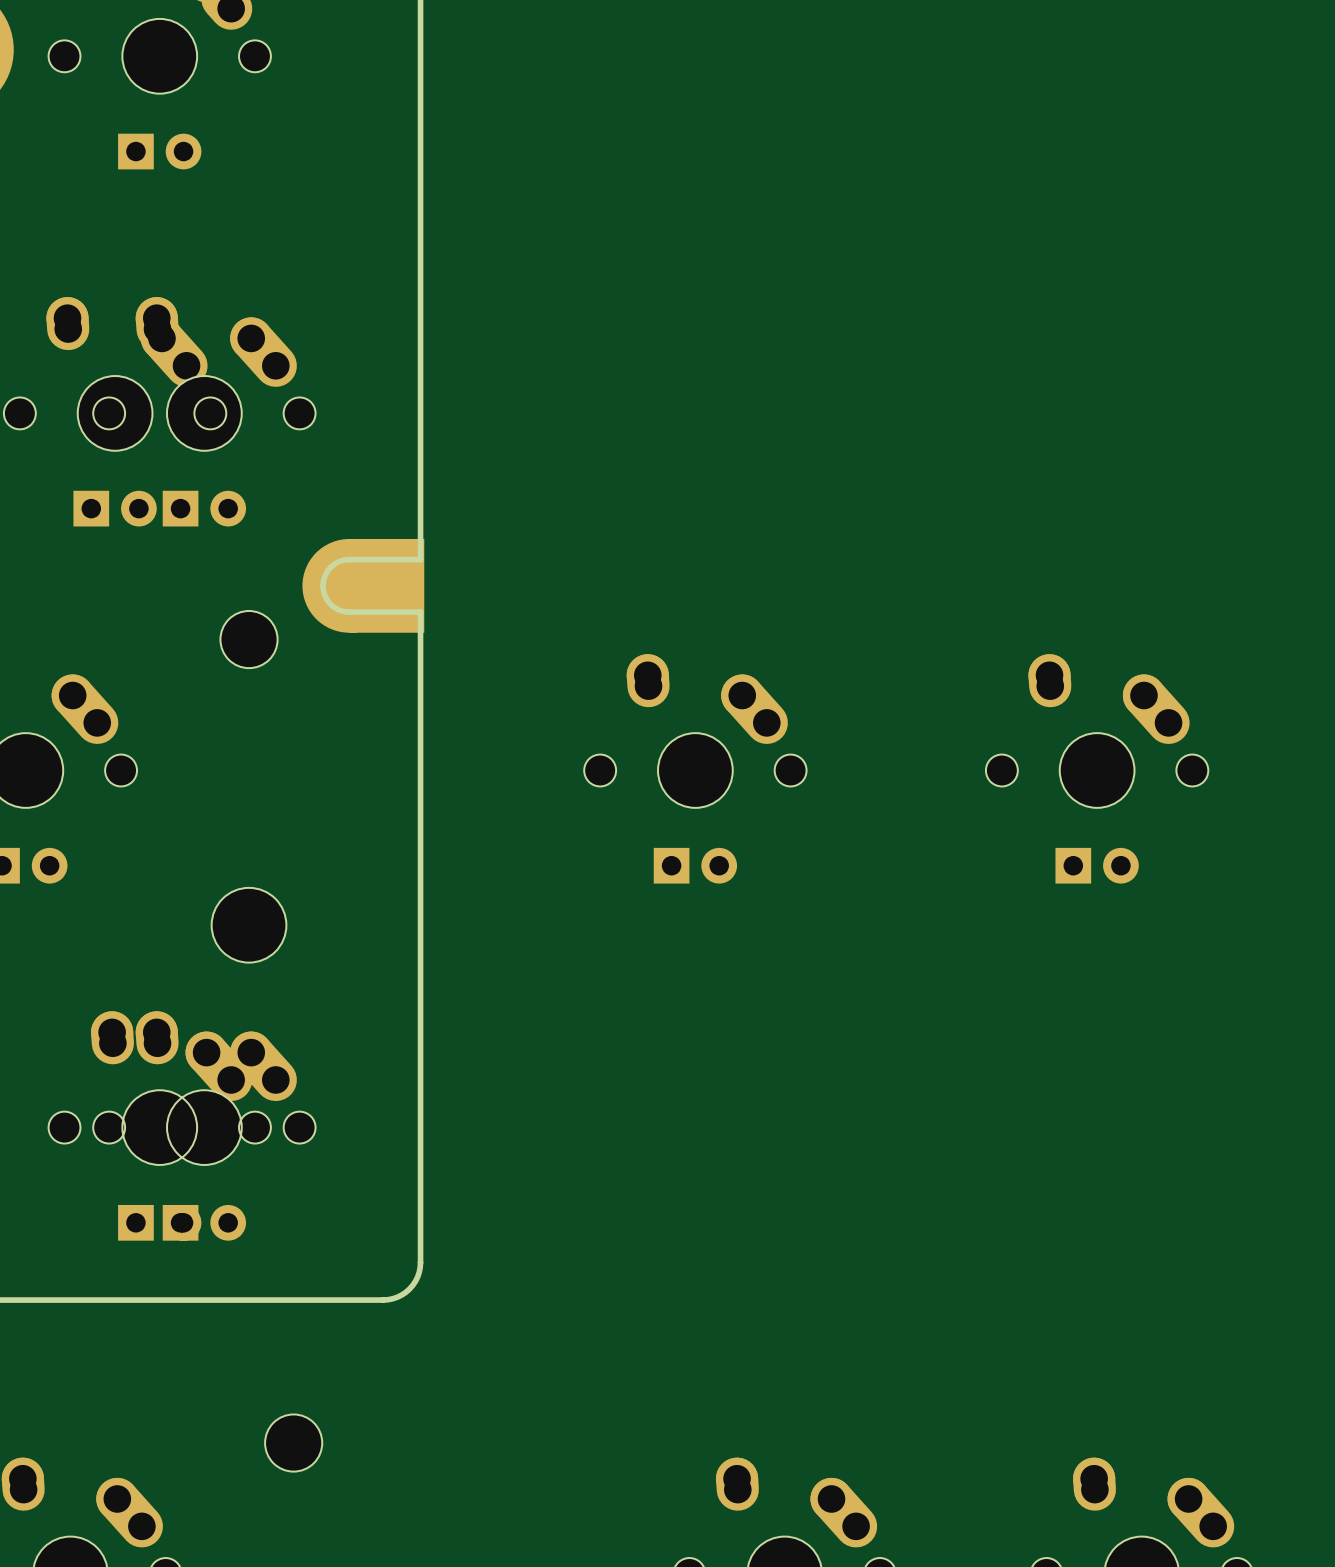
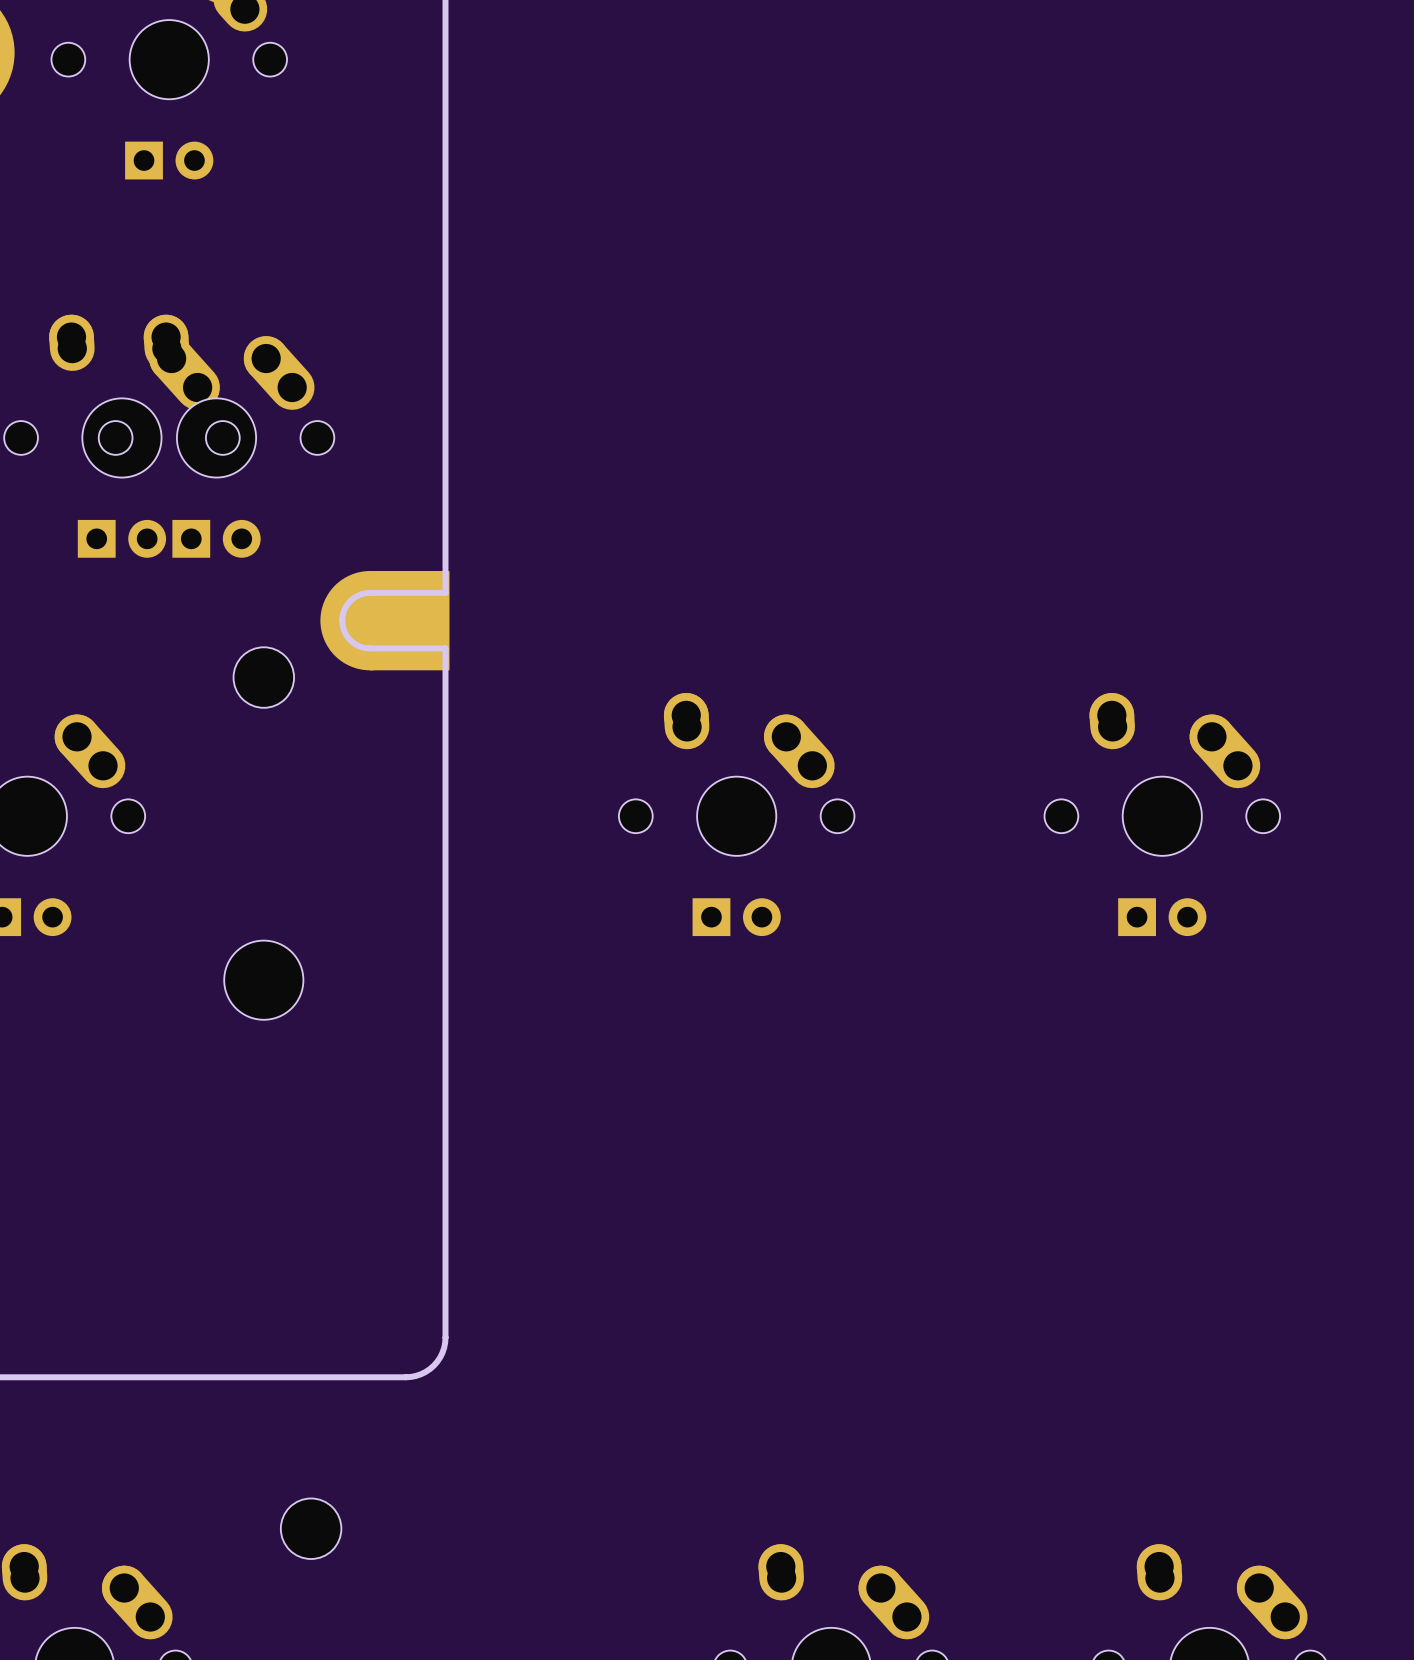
part: (159, 1125) -> none
part: (204, 1125) -> none

